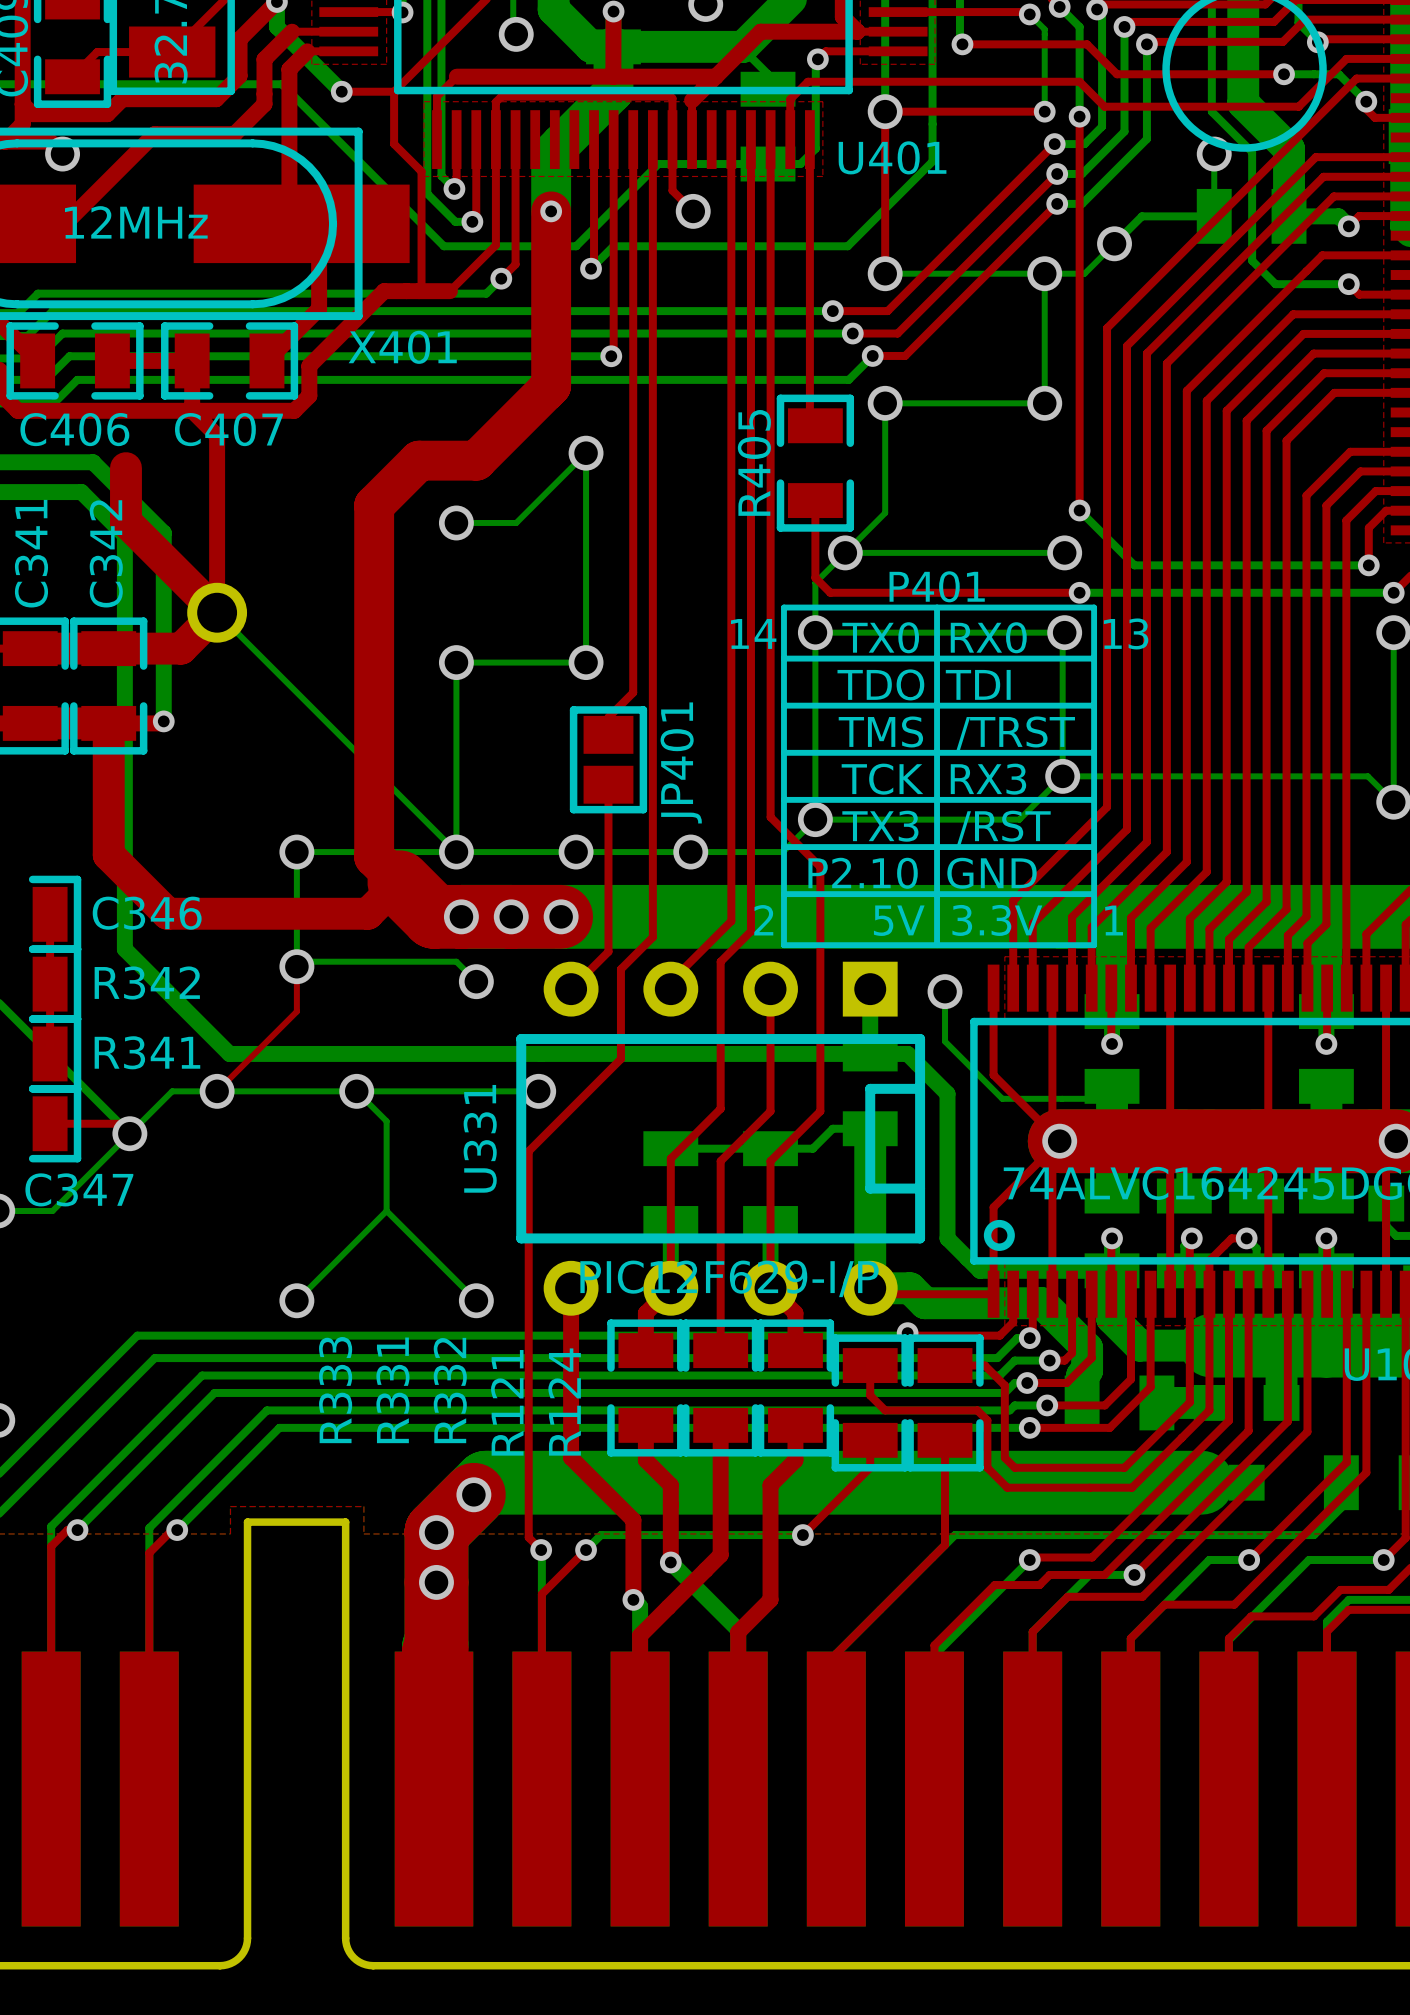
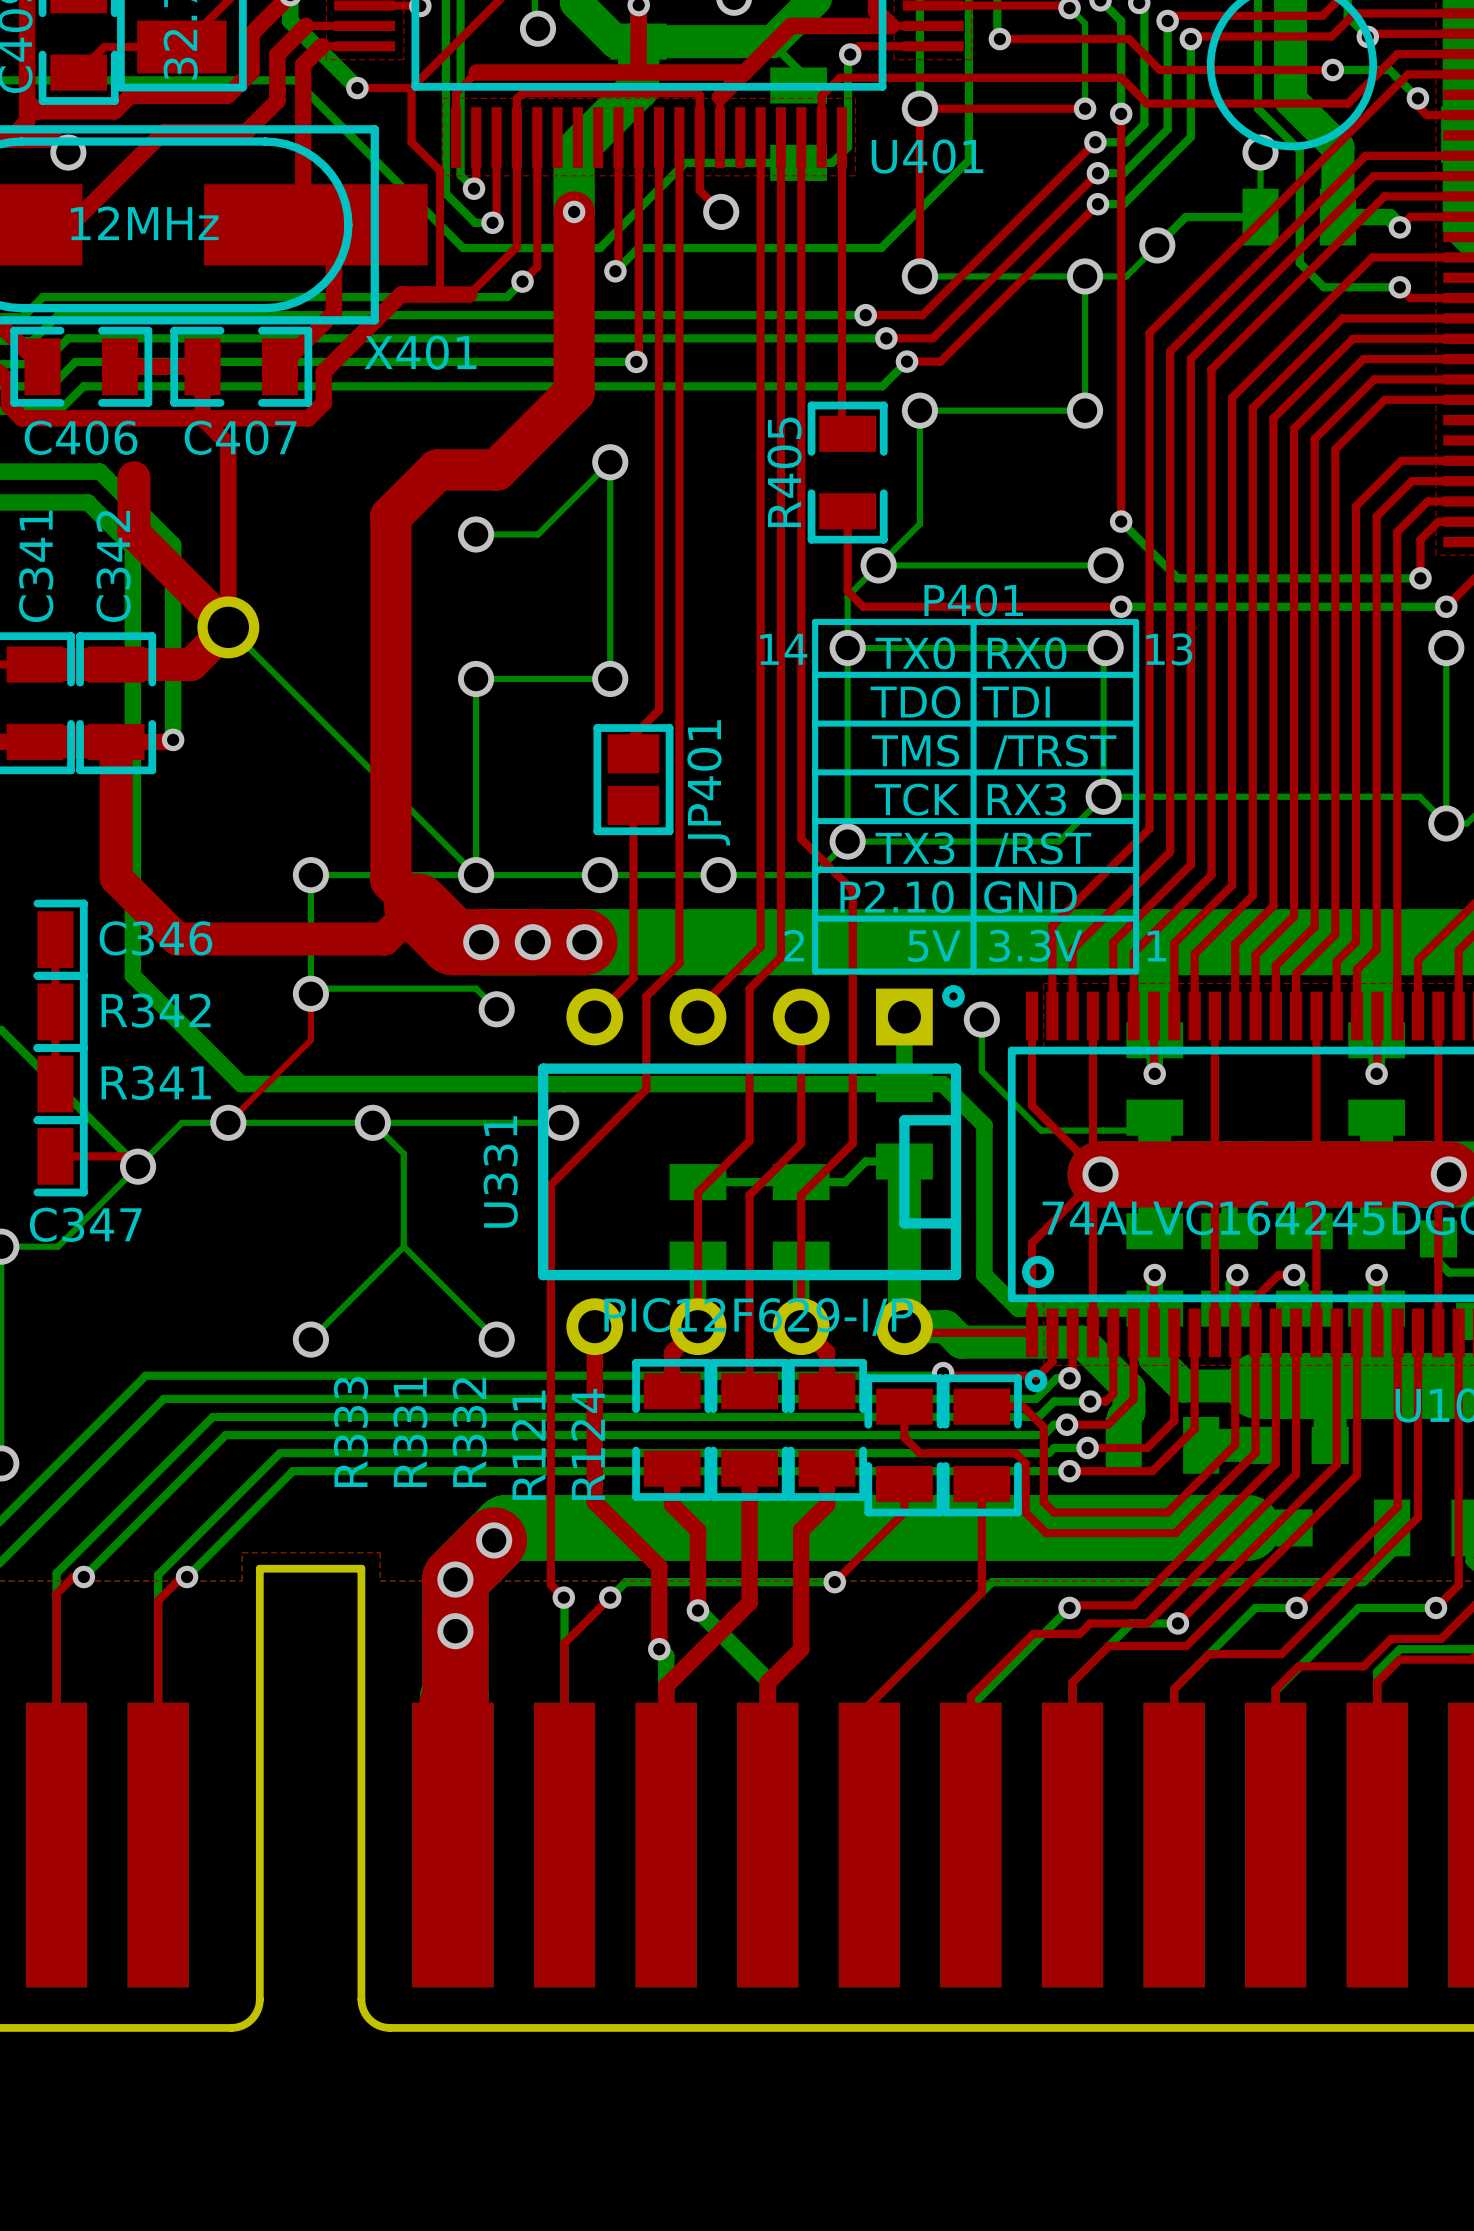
drawing: none -> [942, 985, 965, 1008]
drawing: none -> [1024, 1369, 1048, 1393]

